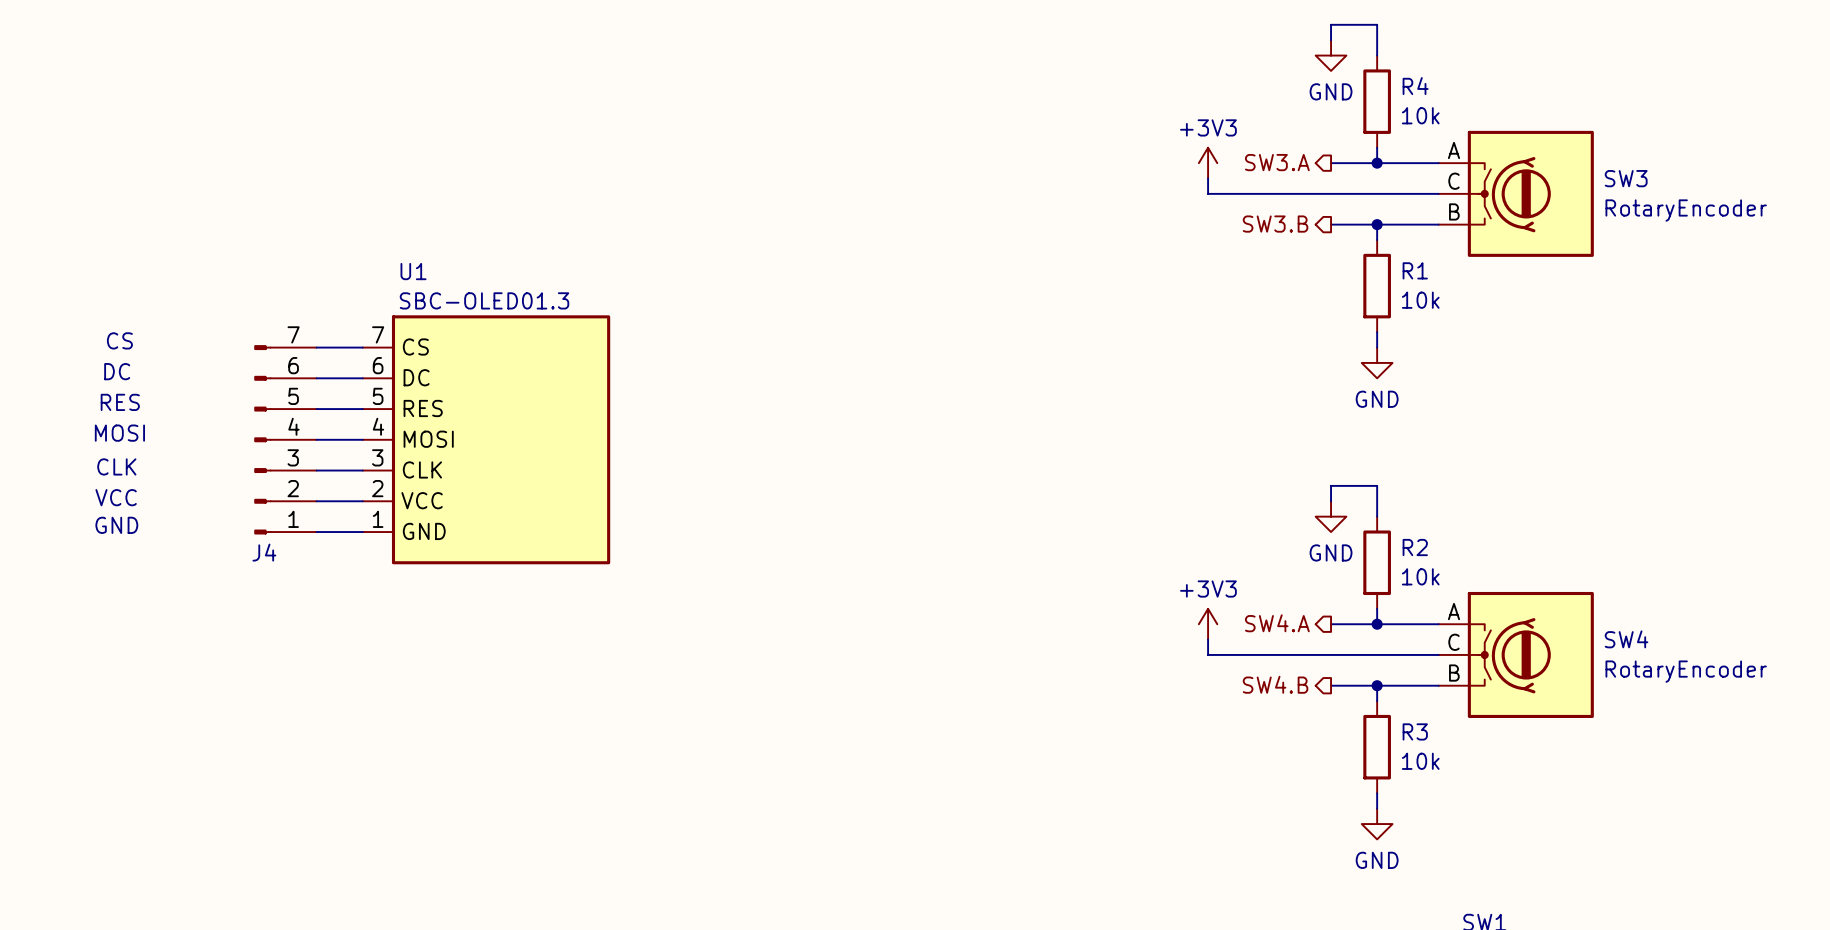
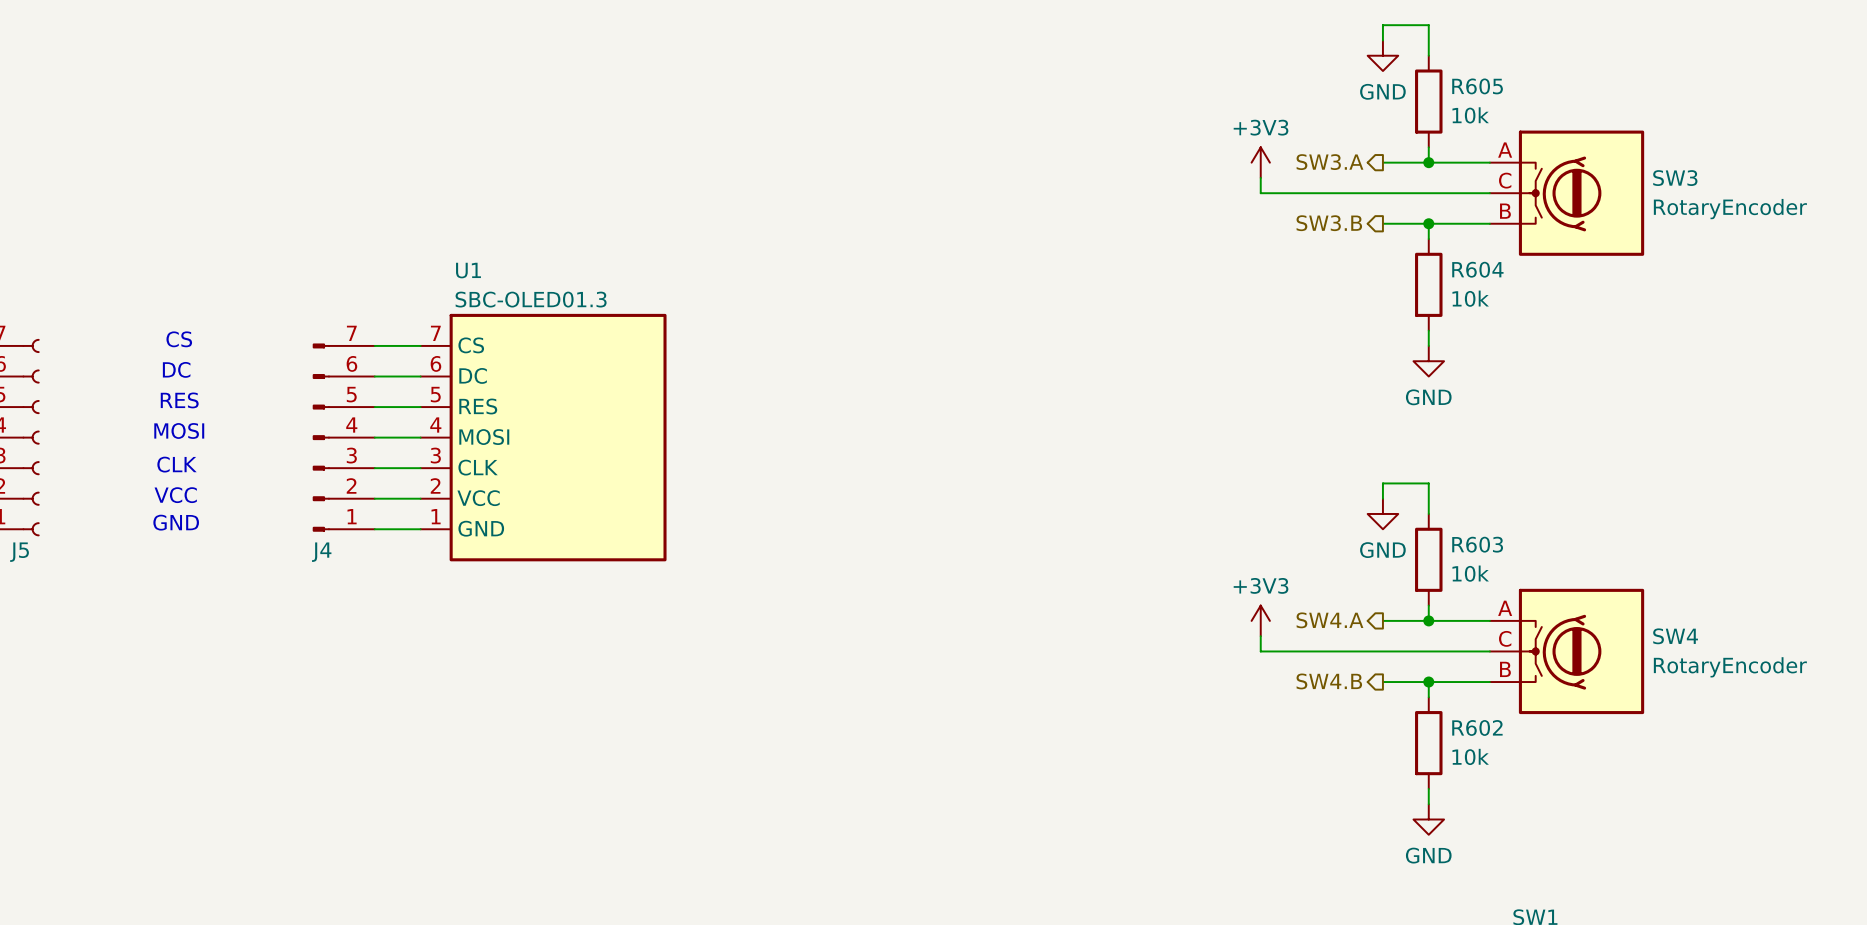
R4 name: R4 (1415, 86) -> R605 (1477, 86)
R1 name: R1 (1415, 270) -> R604 (1477, 269)
R2 name: R2 (1415, 547) -> R603 (1477, 544)
R3 name: R3 (1415, 731) -> R602 (1477, 727)

